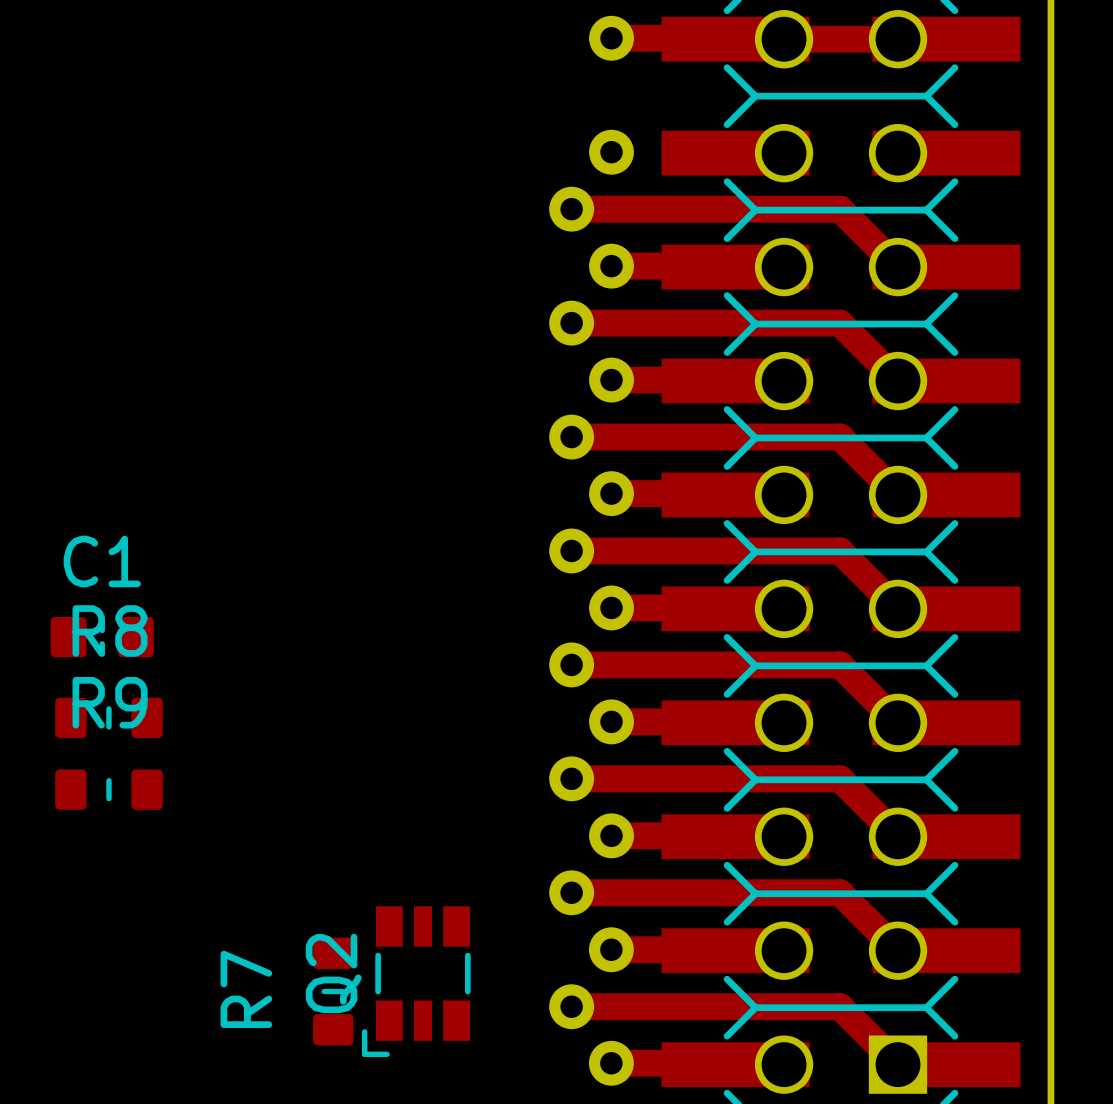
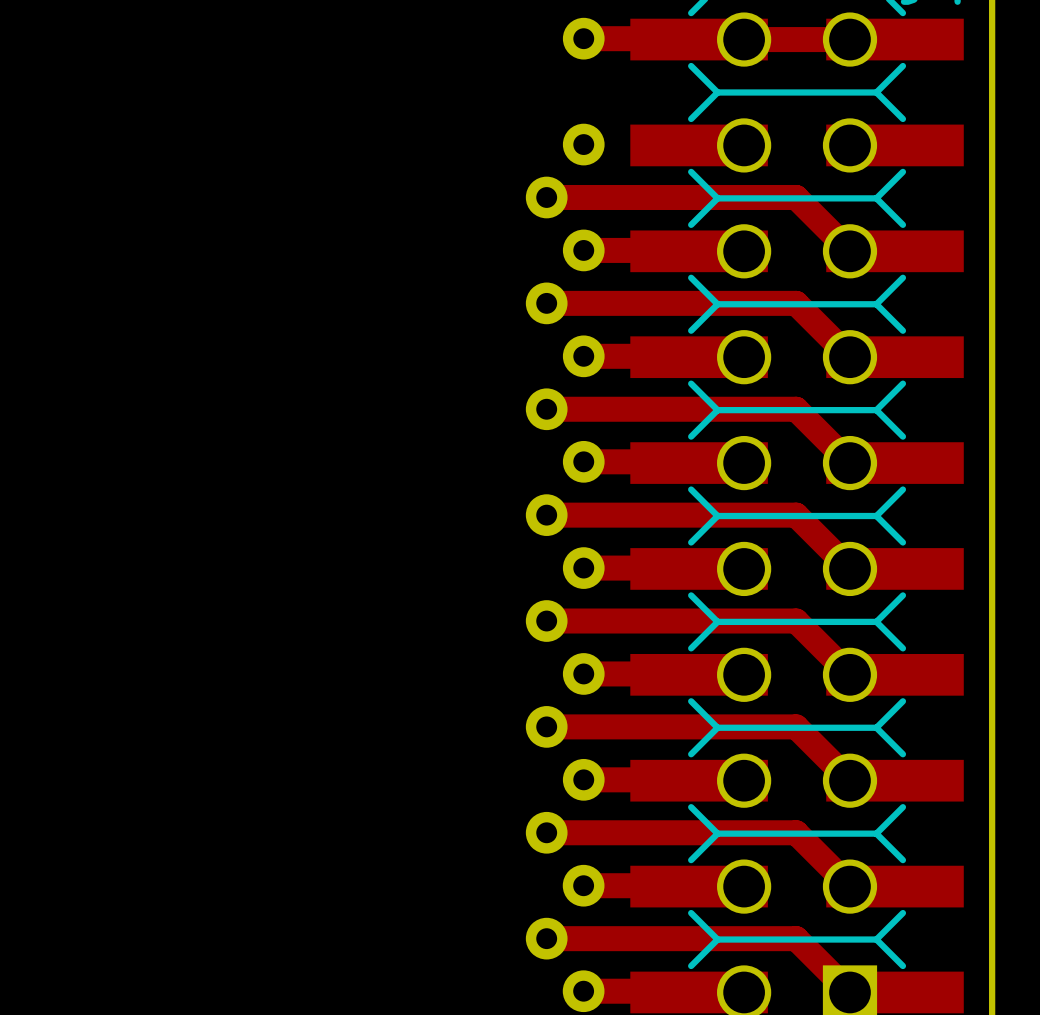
C1: (102, 637) -> none
R8: (108, 717) -> none
R9: (108, 789) -> none
Q2: (416, 981) -> none
R7: (333, 991) -> none

